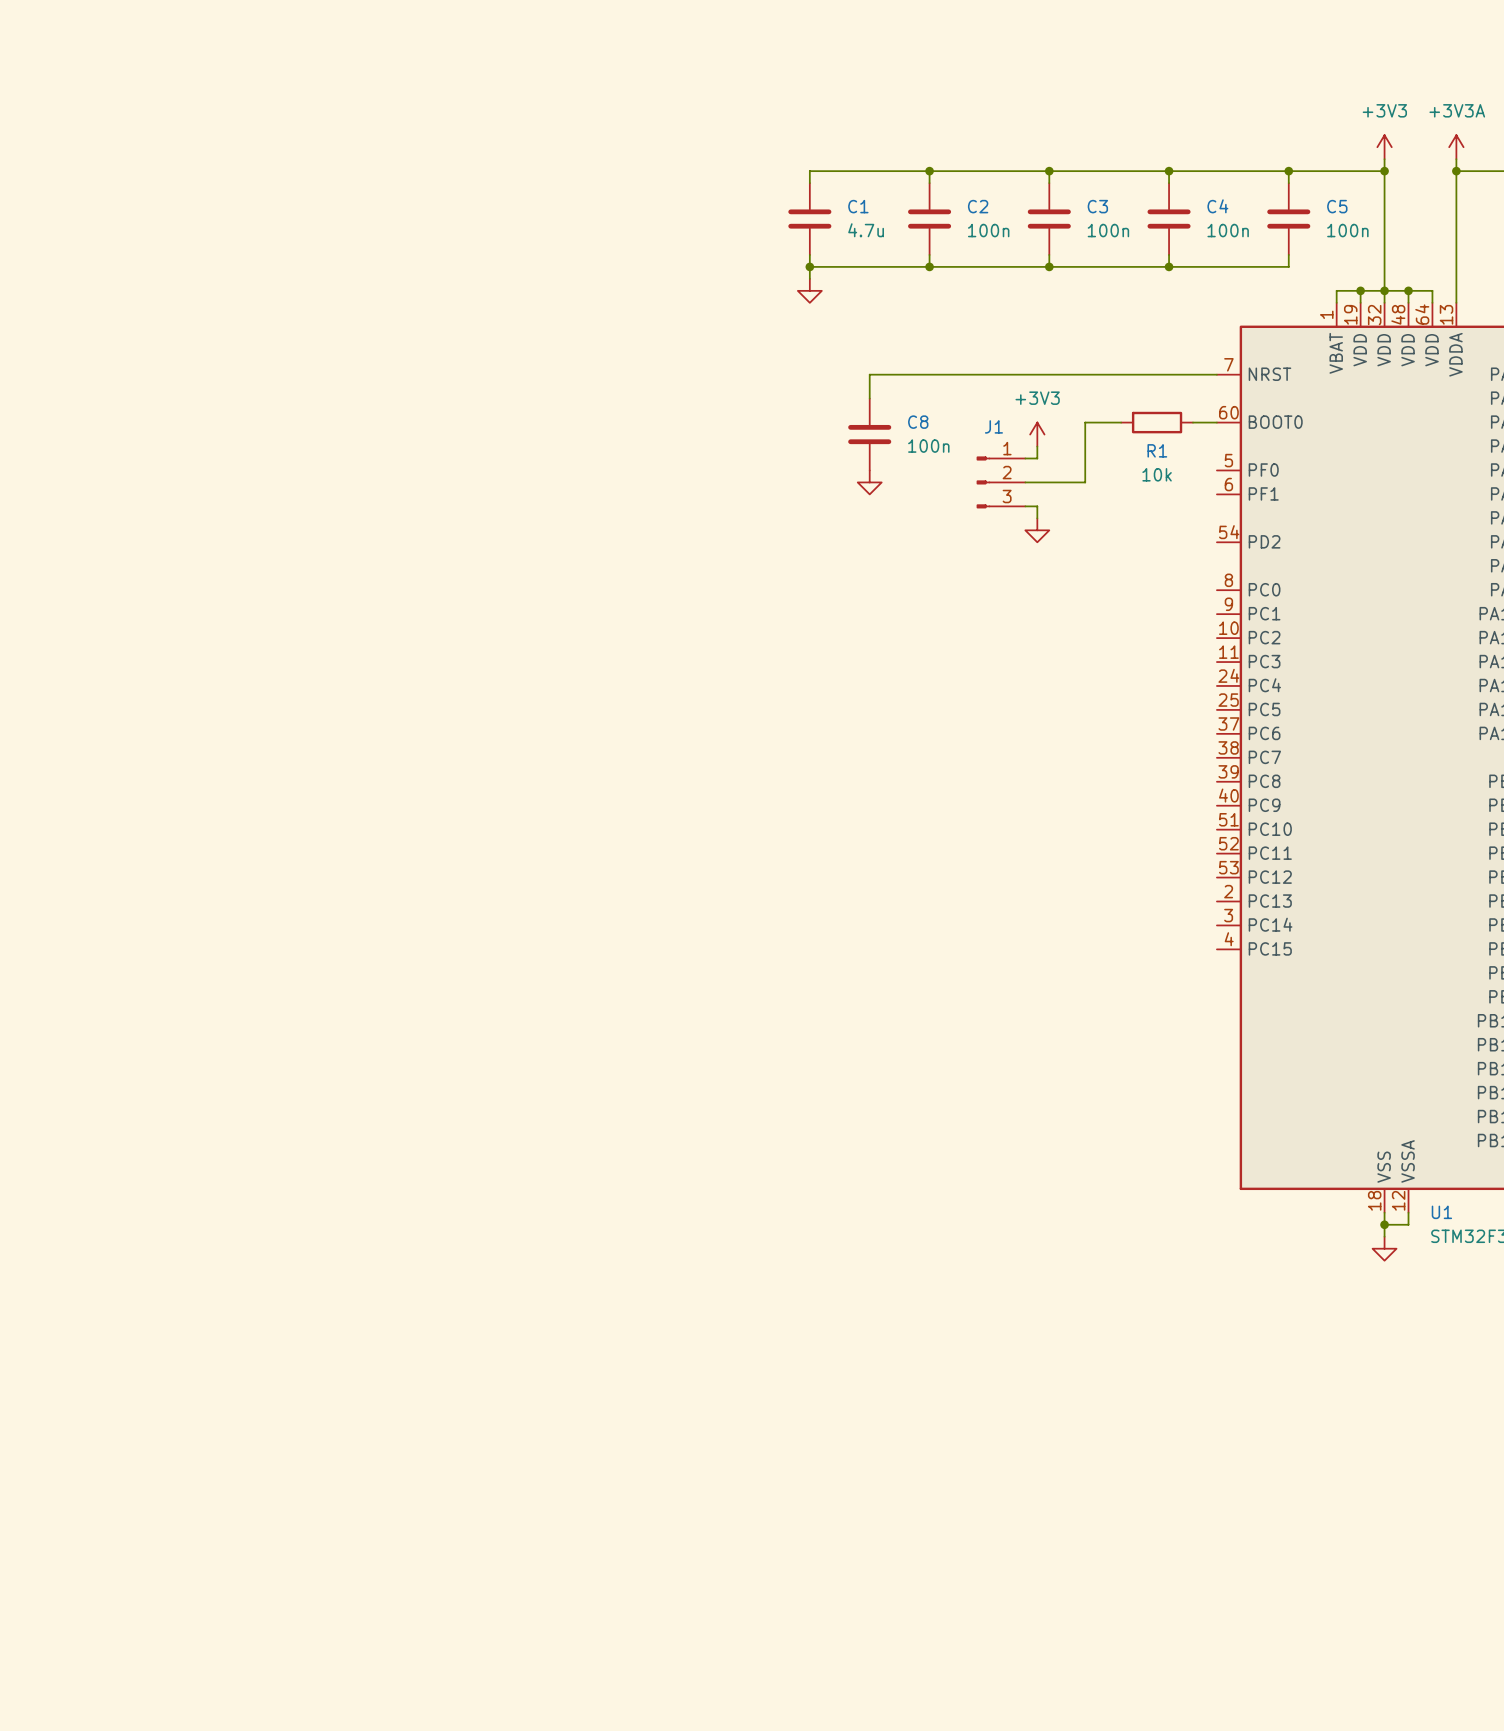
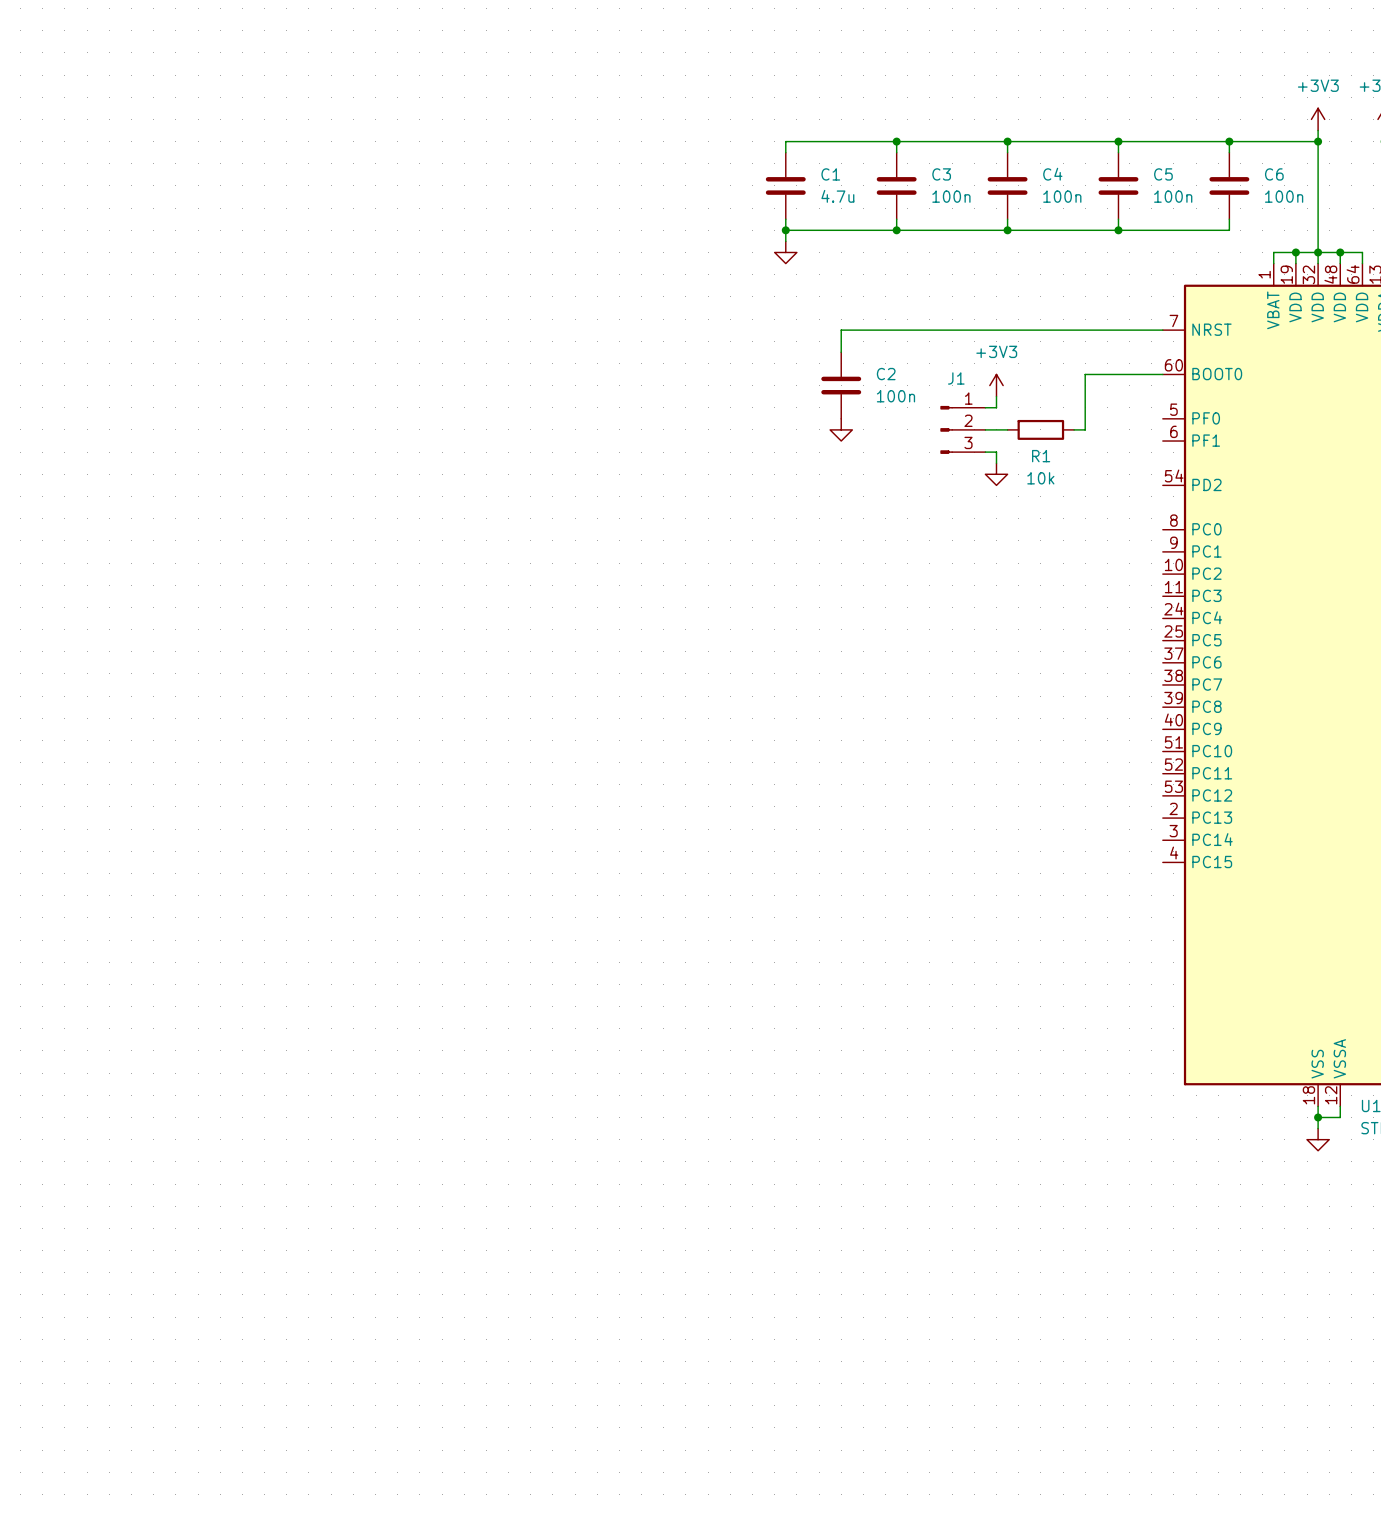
C2 name: C2 (978, 206) -> C3 (941, 174)
C3 name: C3 (1097, 206) -> C4 (1052, 174)
C4 name: C4 (1217, 206) -> C5 (1163, 174)
C5 name: C5 (1337, 206) -> C6 (1274, 174)
C8 name: C8 (918, 422) -> C2 (886, 374)
wire: (1121, 422) (1085, 422) (1085, 482) (1049, 482) -> none
R1 position: (1157, 422) -> (1040, 429)
wire: none -> (1140, 374) (1085, 374) (1085, 429) (1074, 429)

